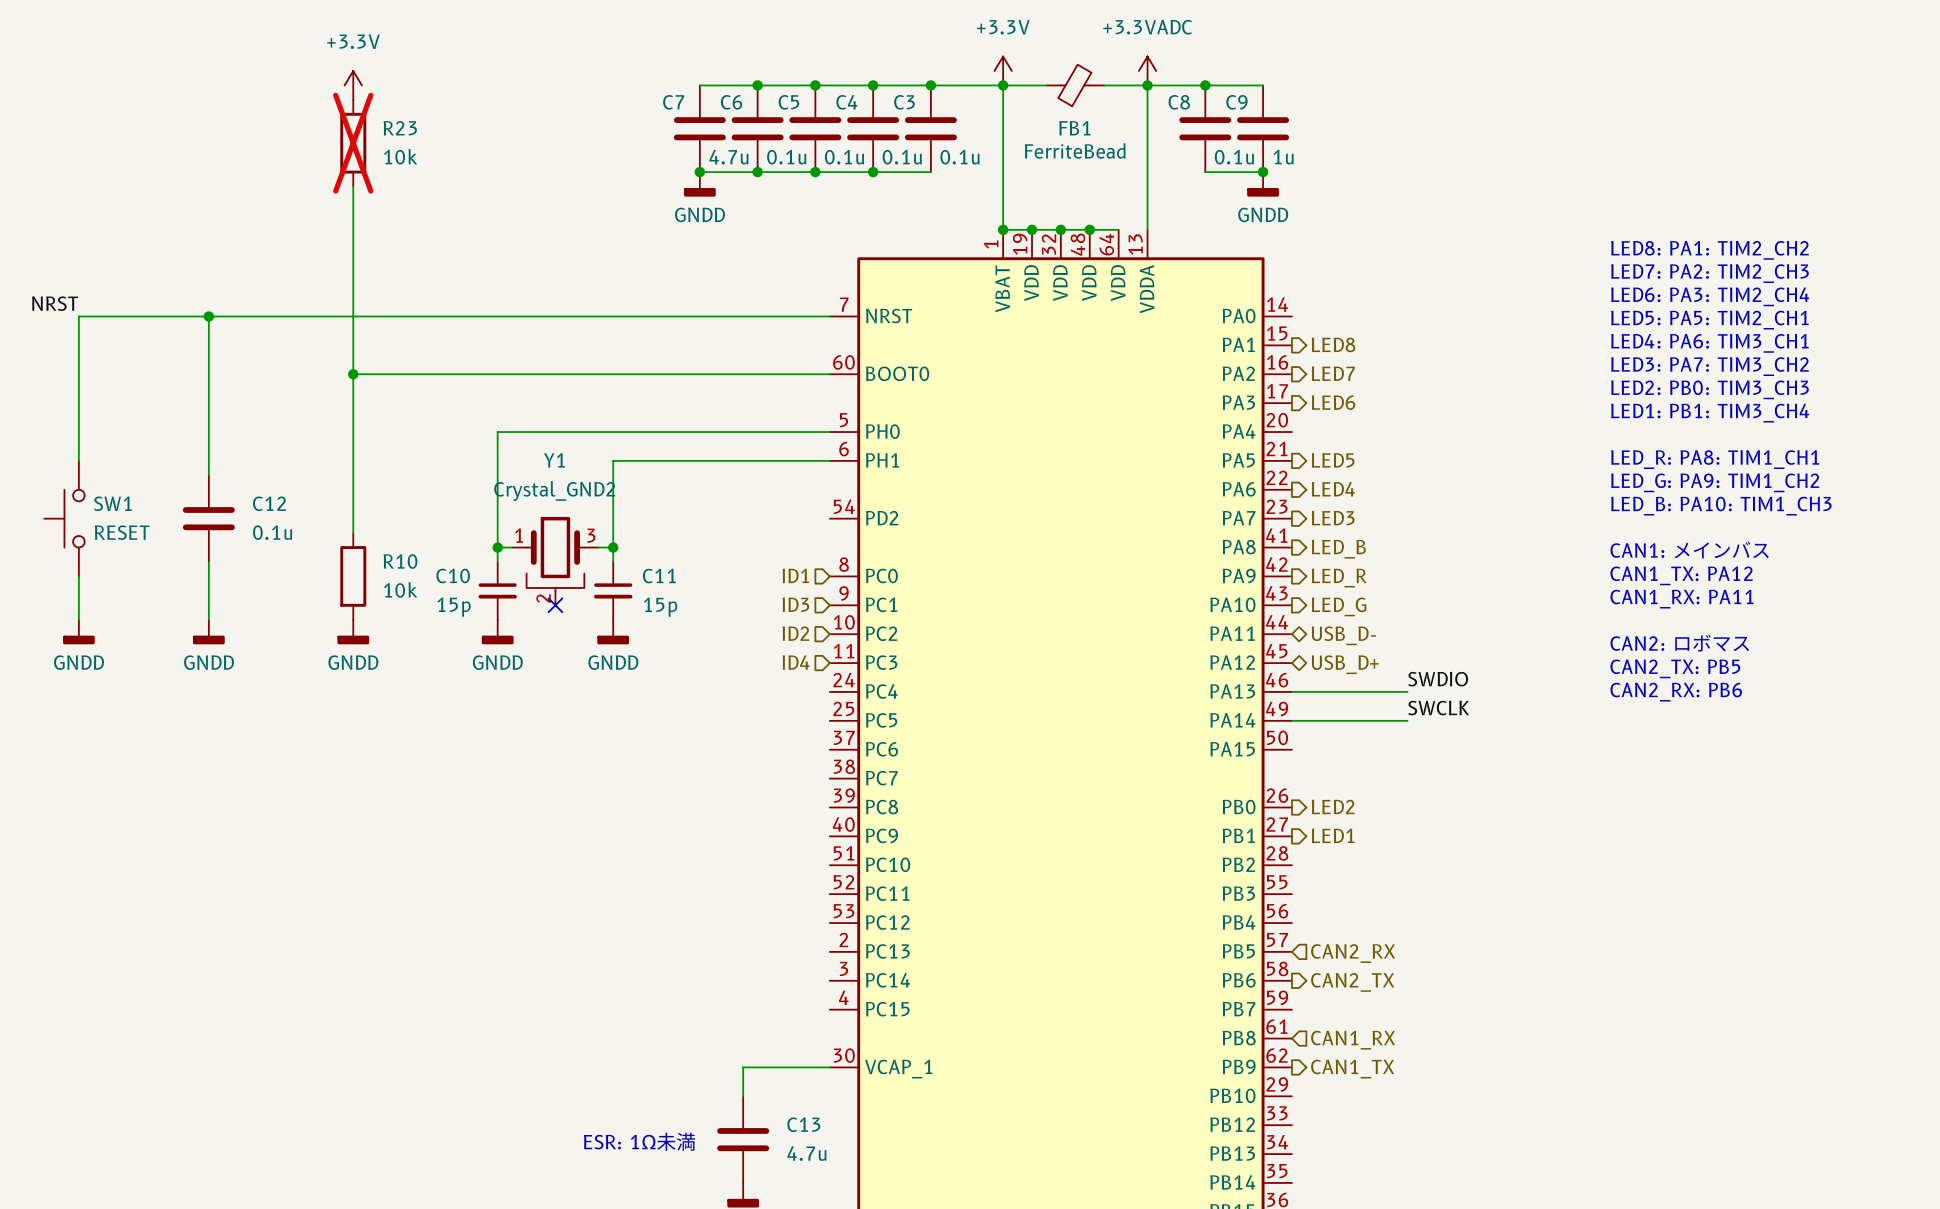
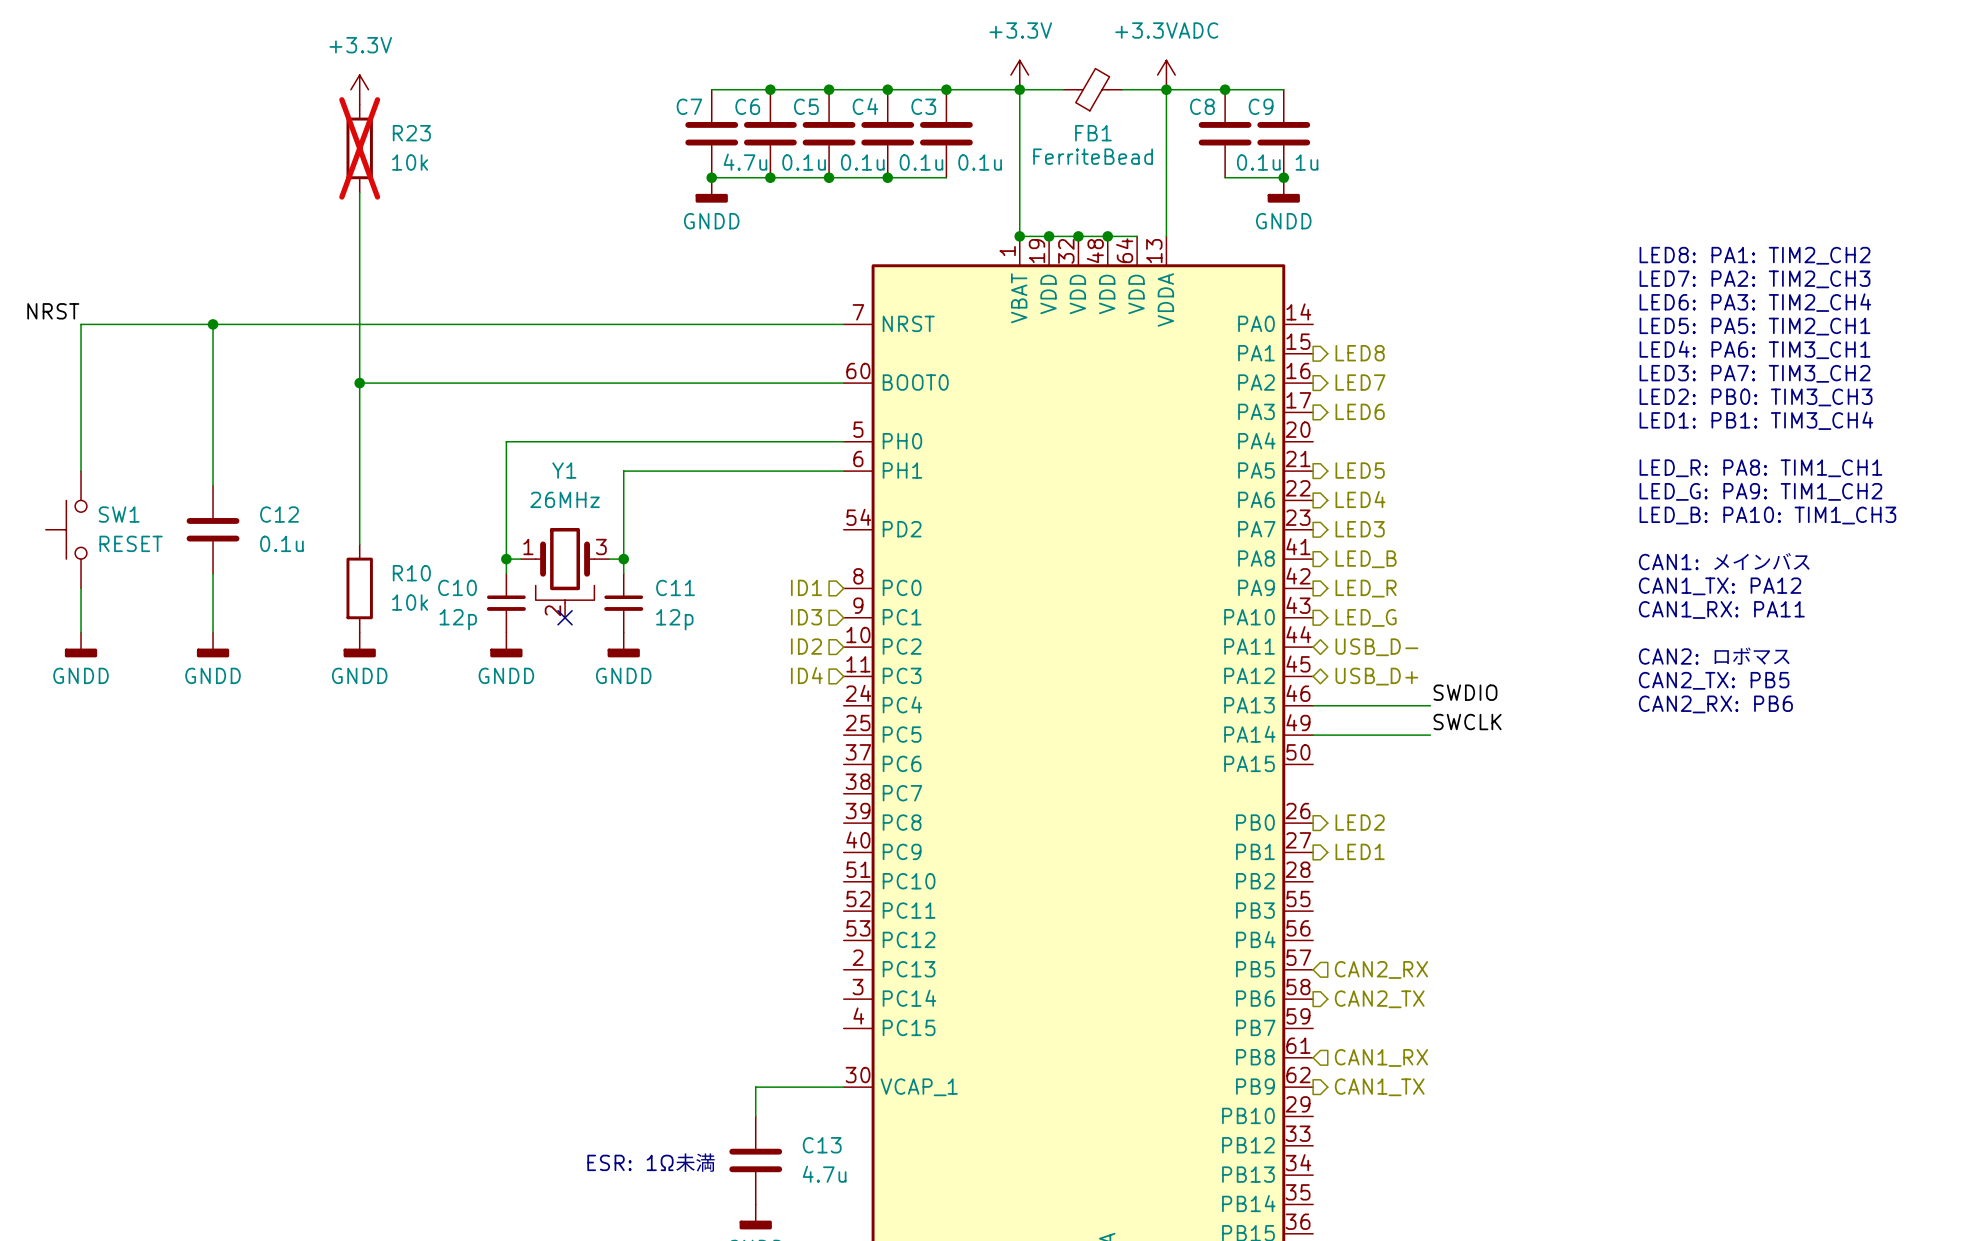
Y1 value: Crystal_GND2 (554, 491) -> 26MHz (565, 499)
C10 value: 15p (454, 607) -> 12p (458, 619)
C11 value: 15p (660, 607) -> 12p (674, 619)

